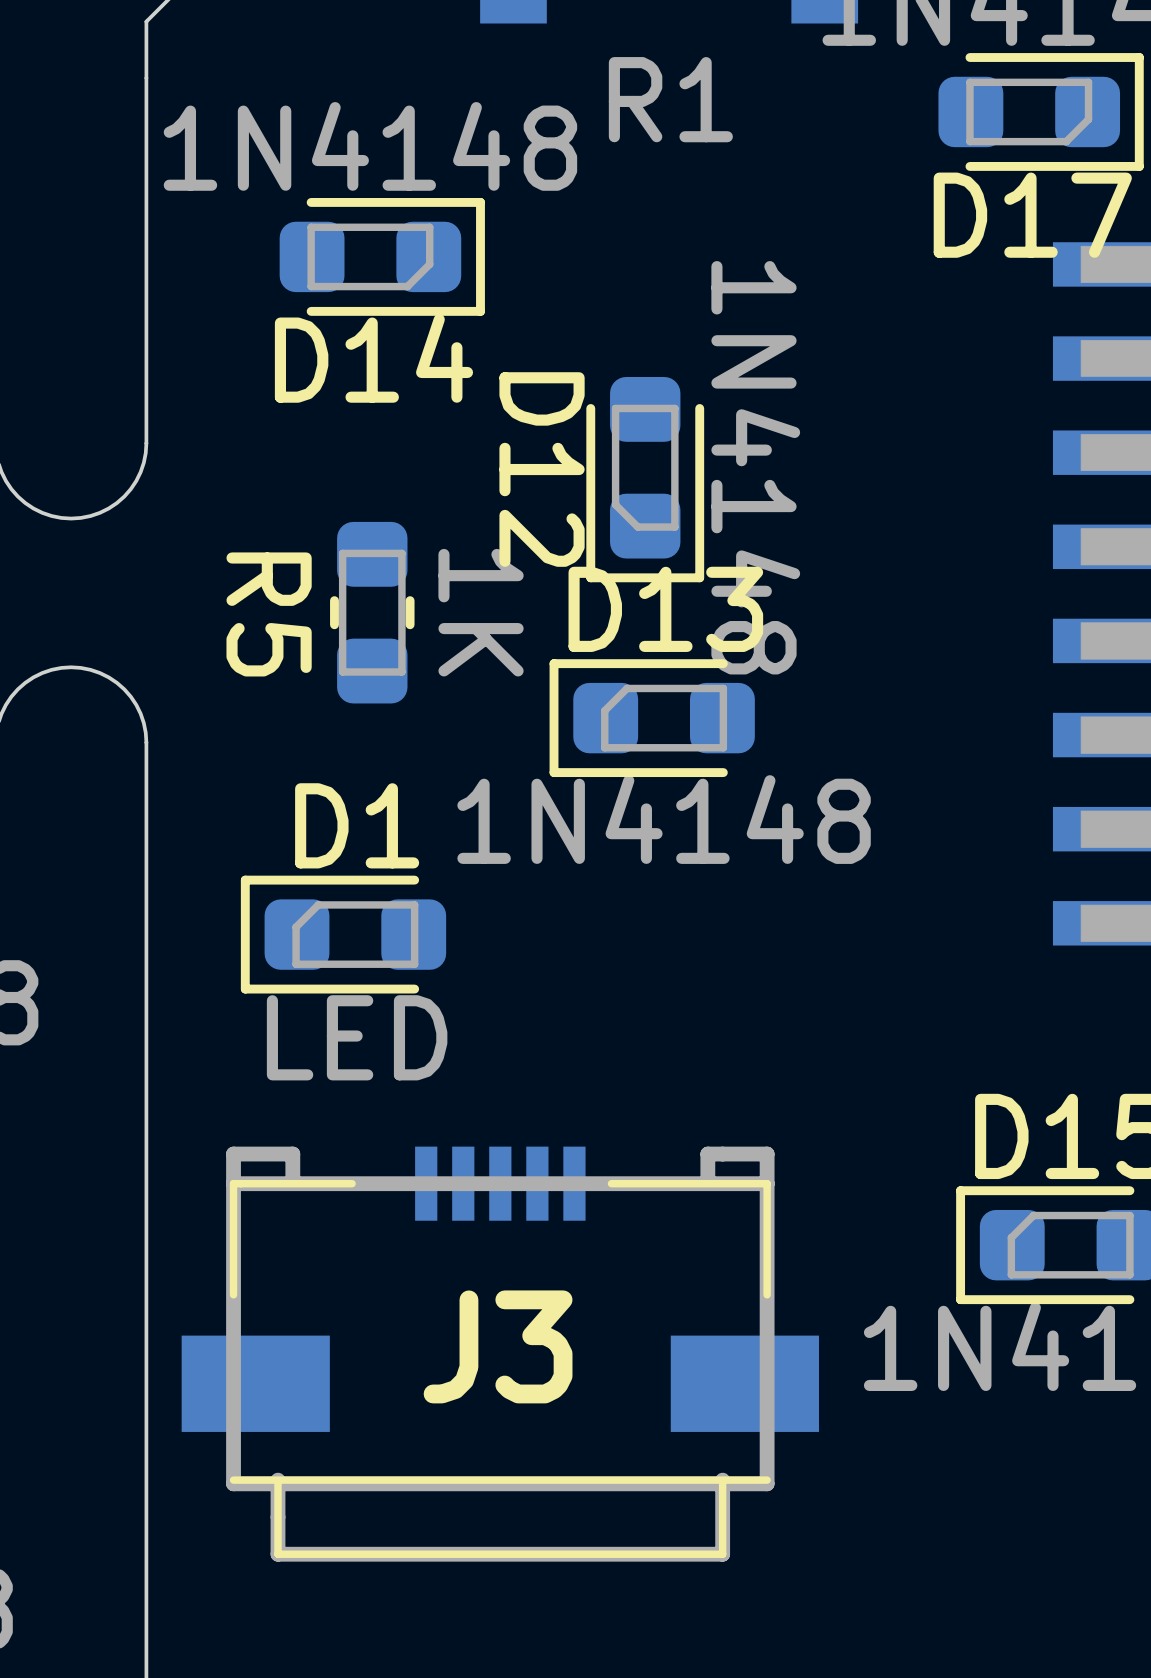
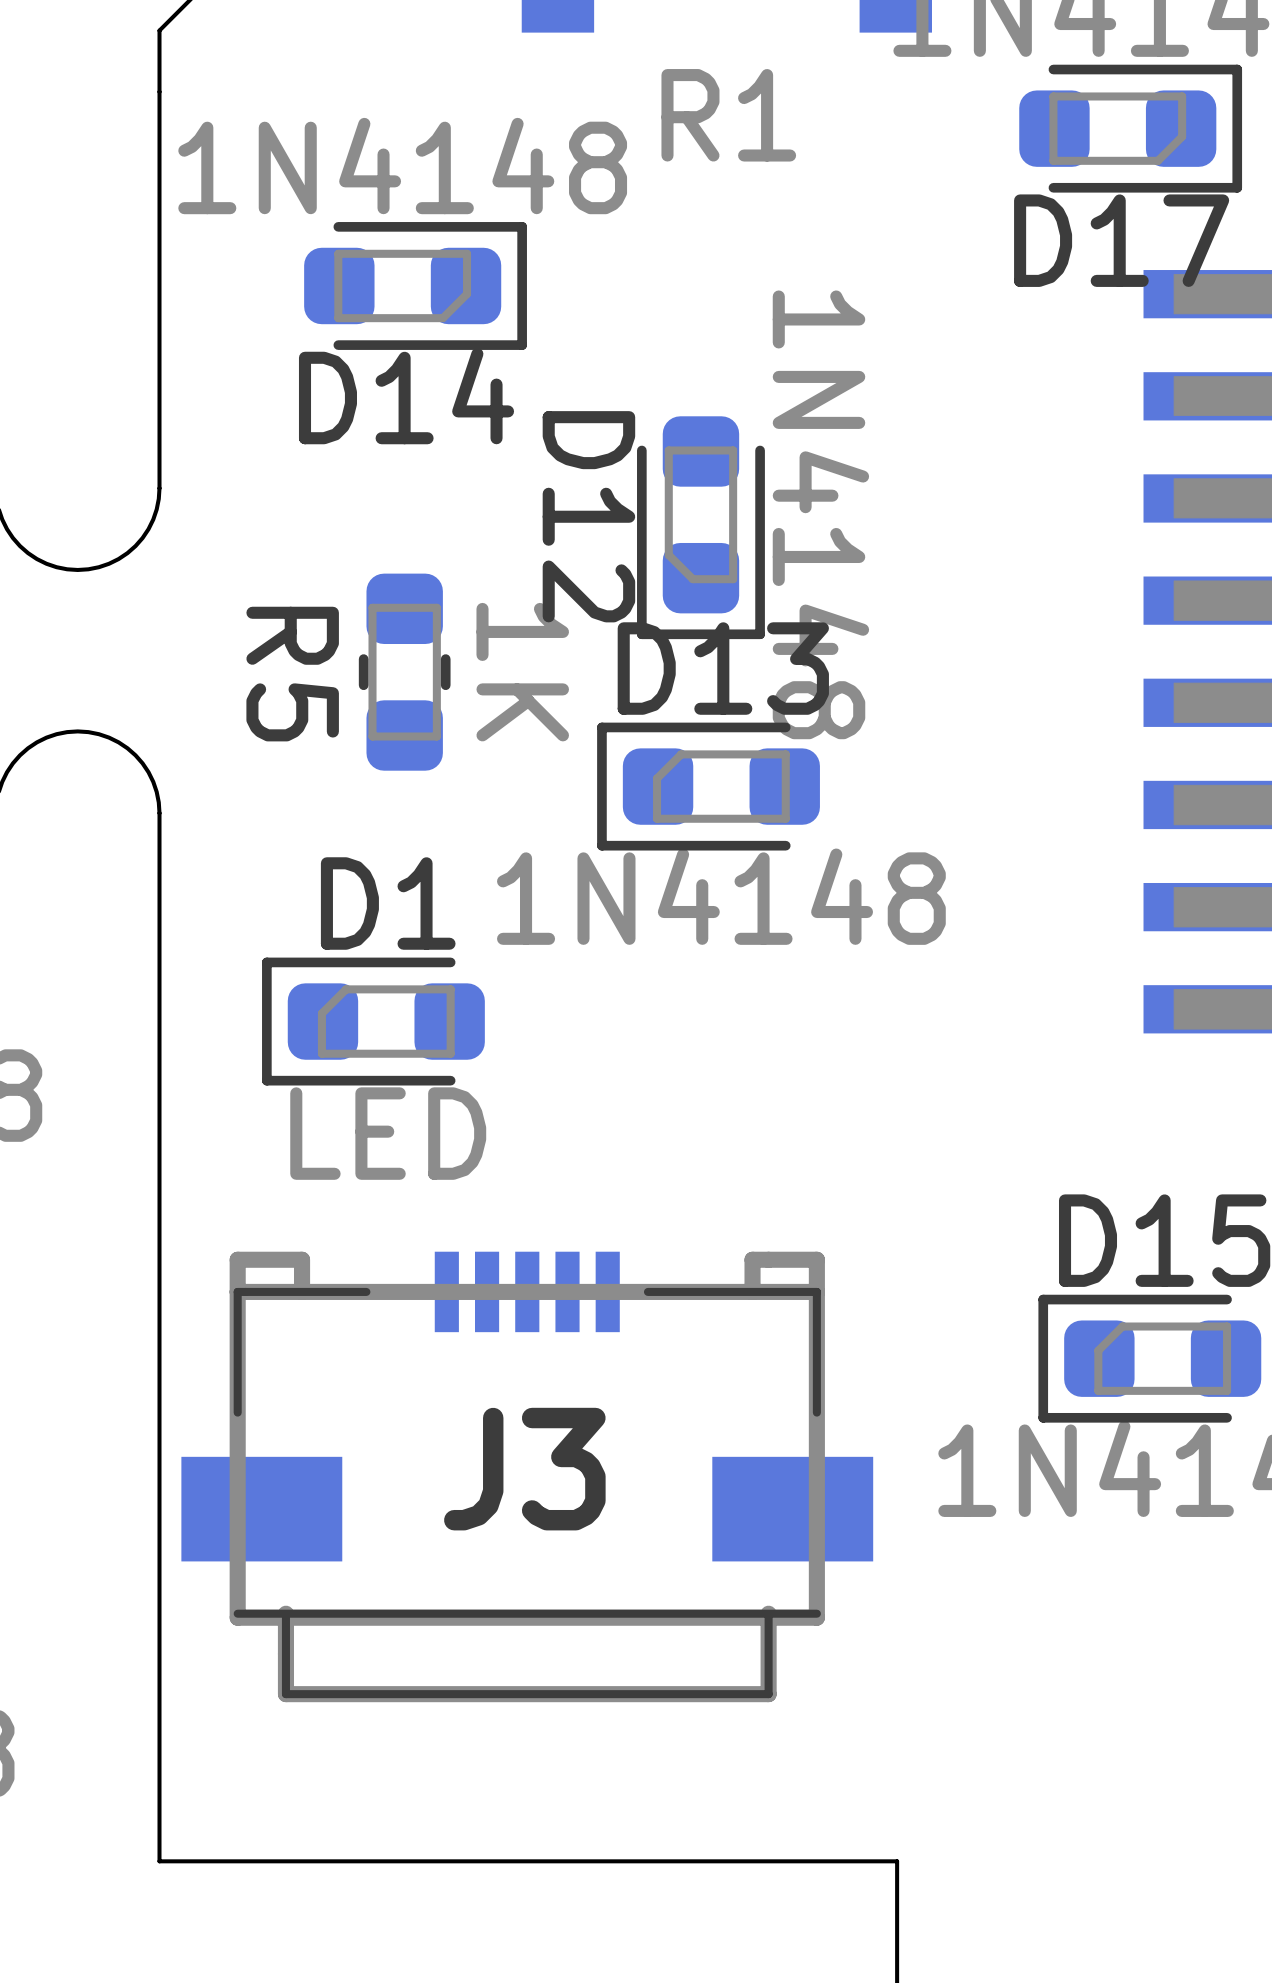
J3 position: (500, 1354) -> (527, 1476)

